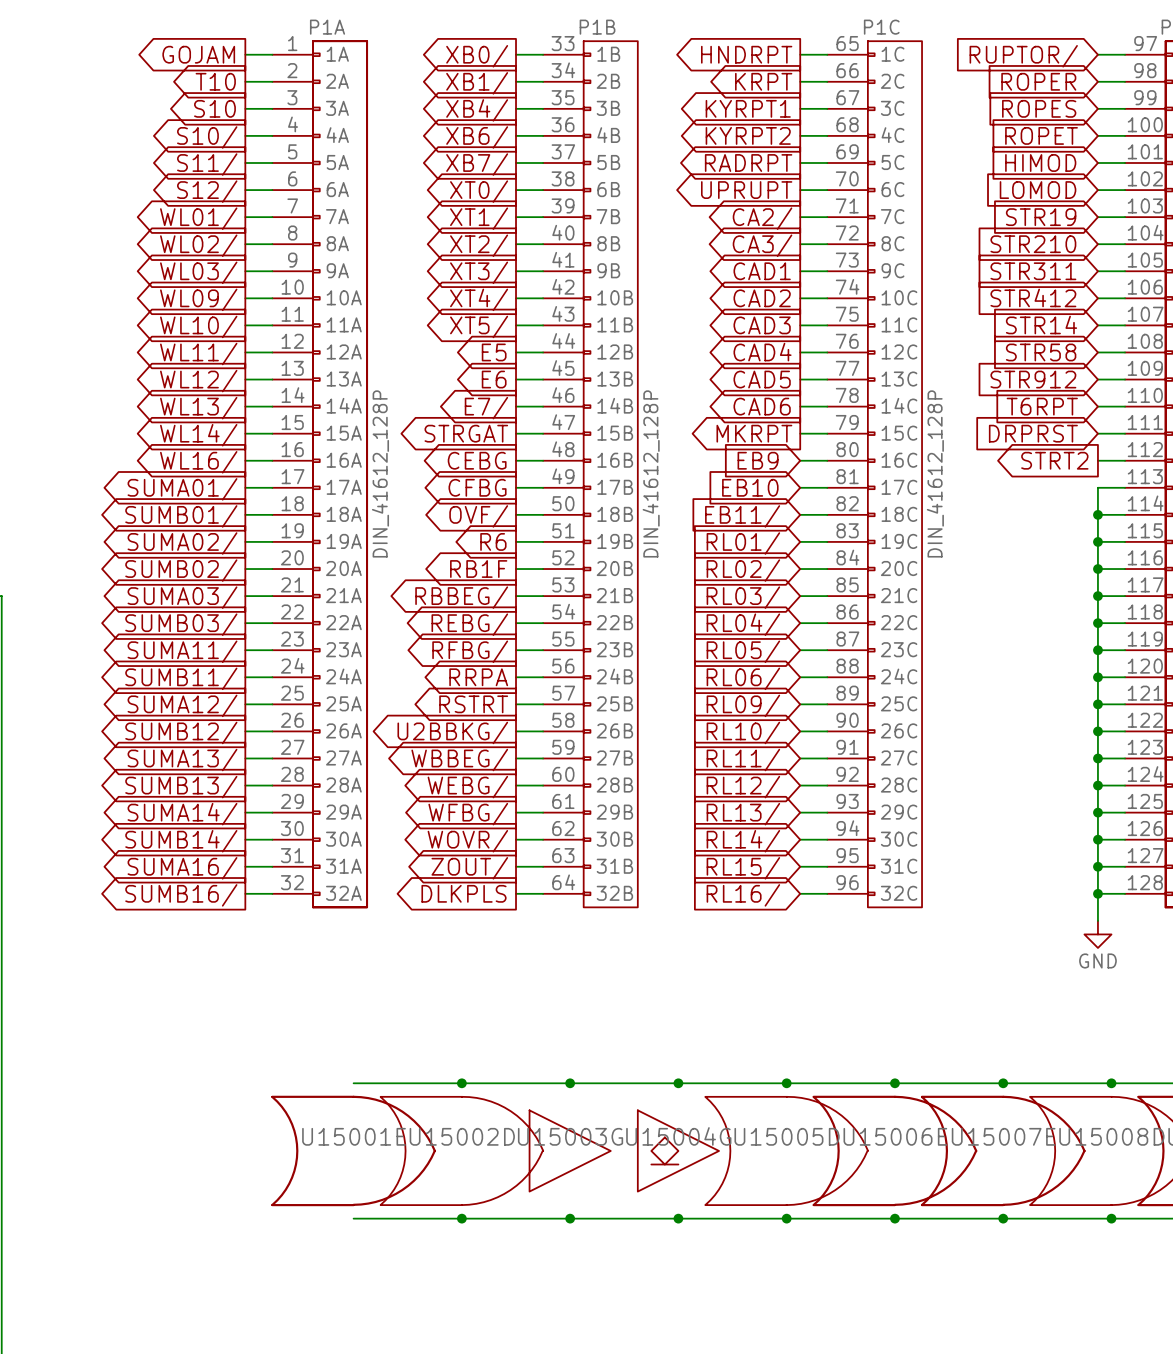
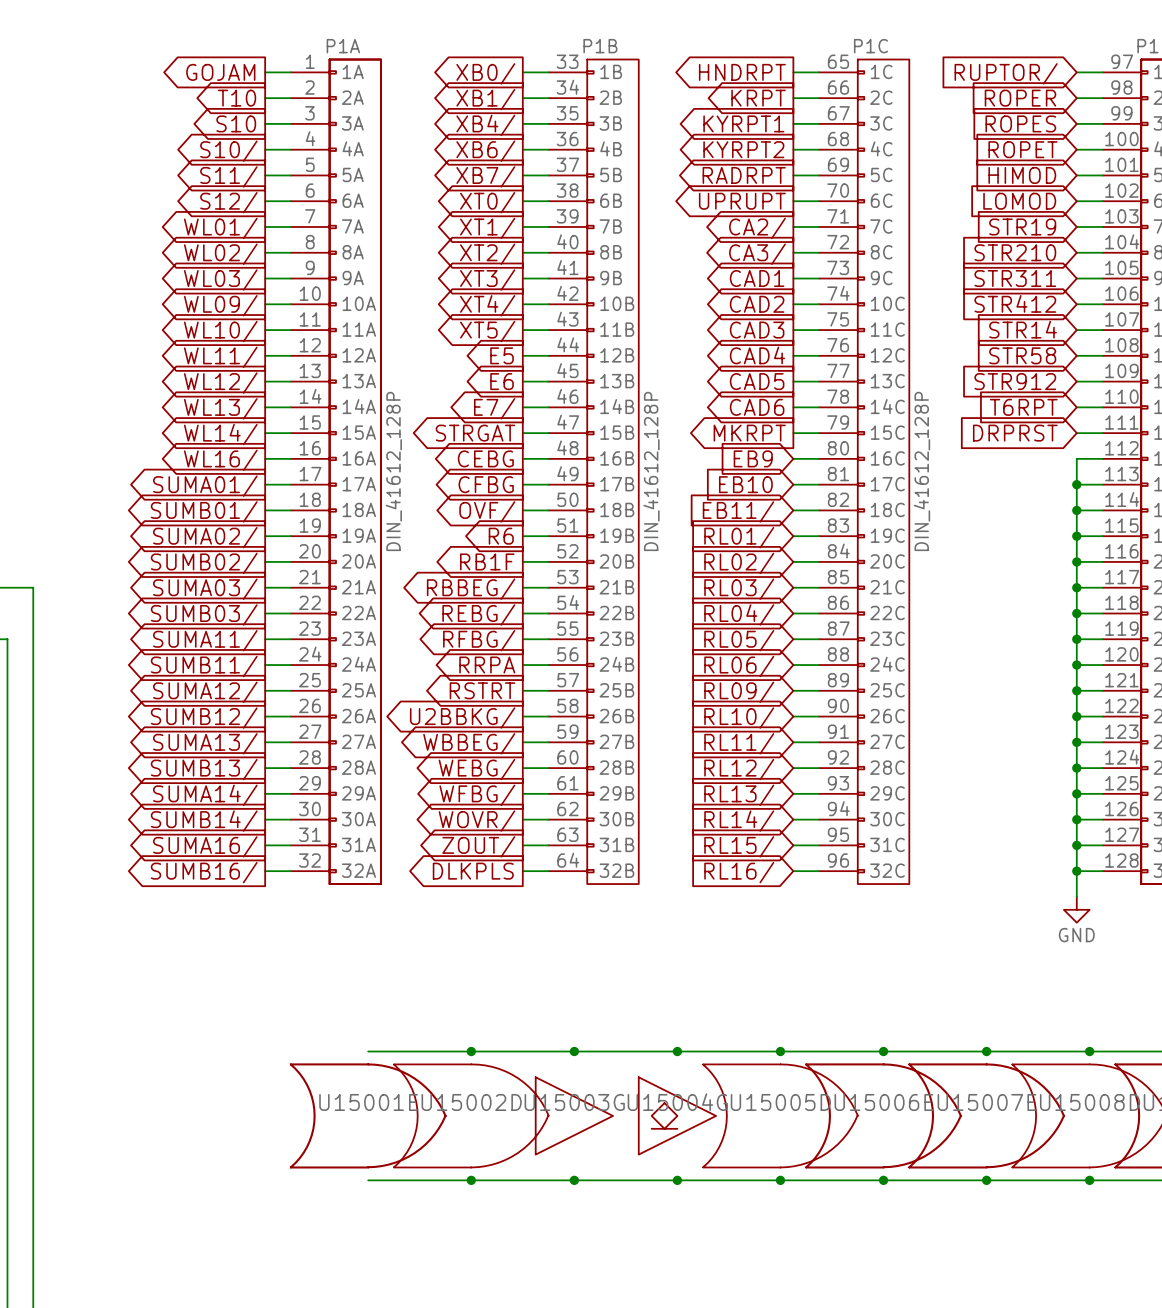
global label: STRT2 (1054, 460) -> none
junction: none -> (1076, 484)

